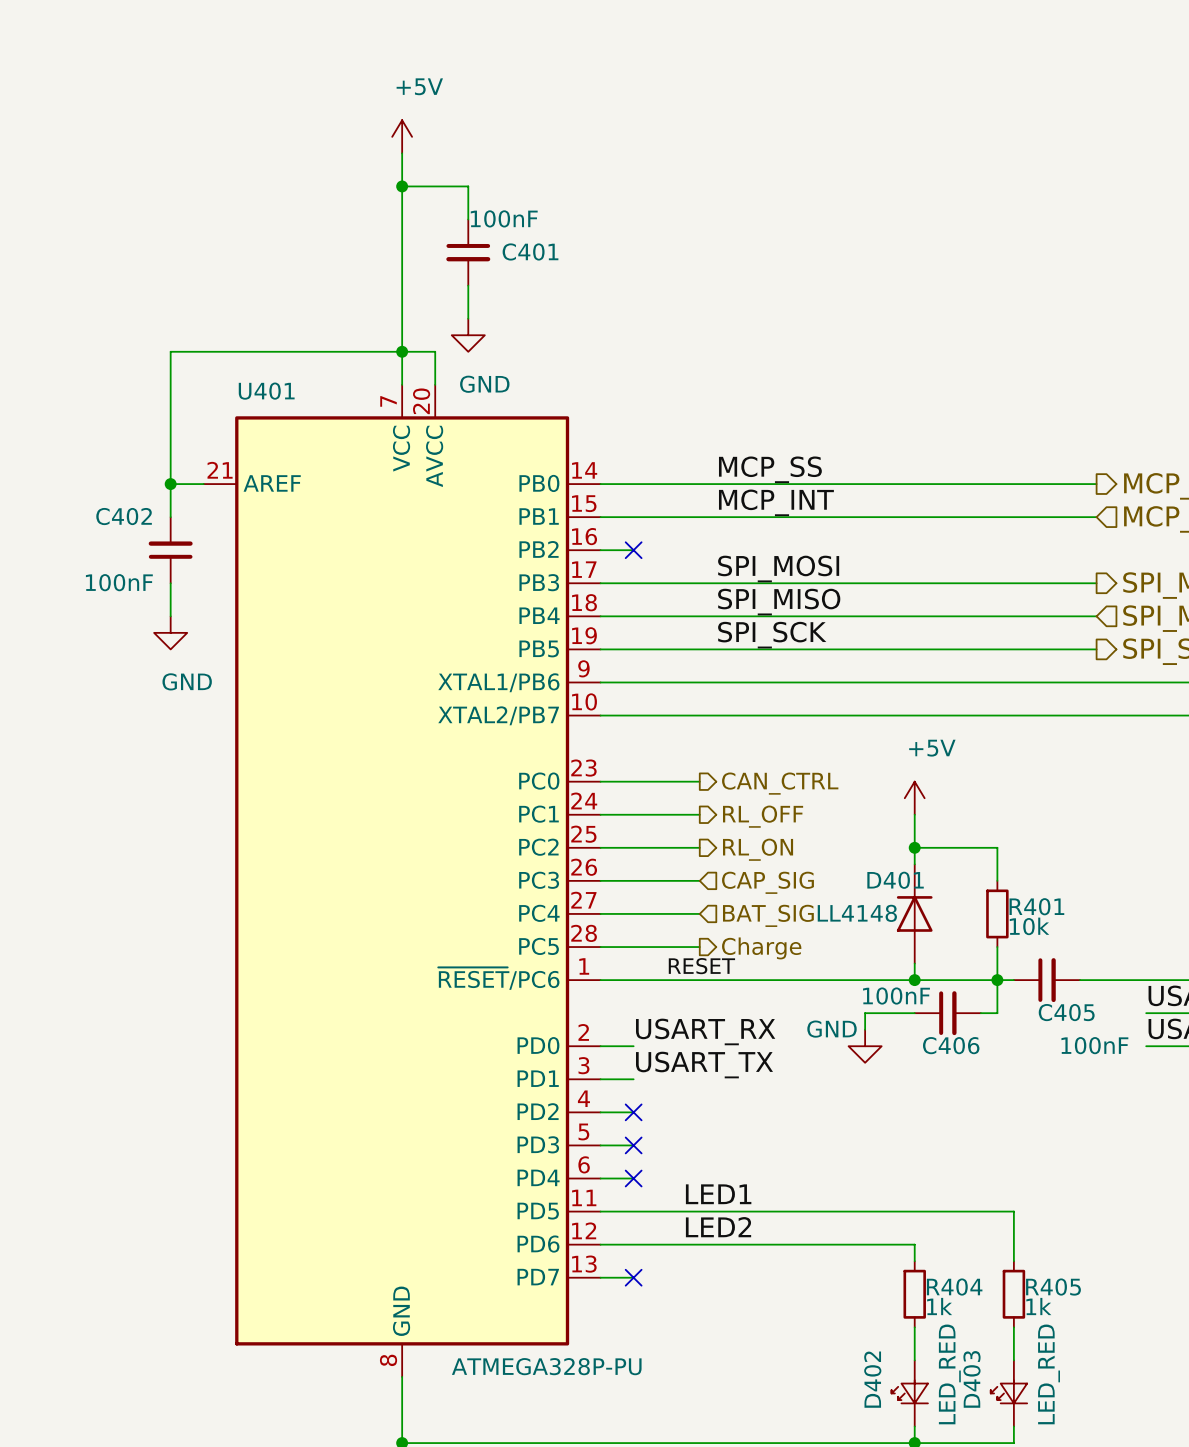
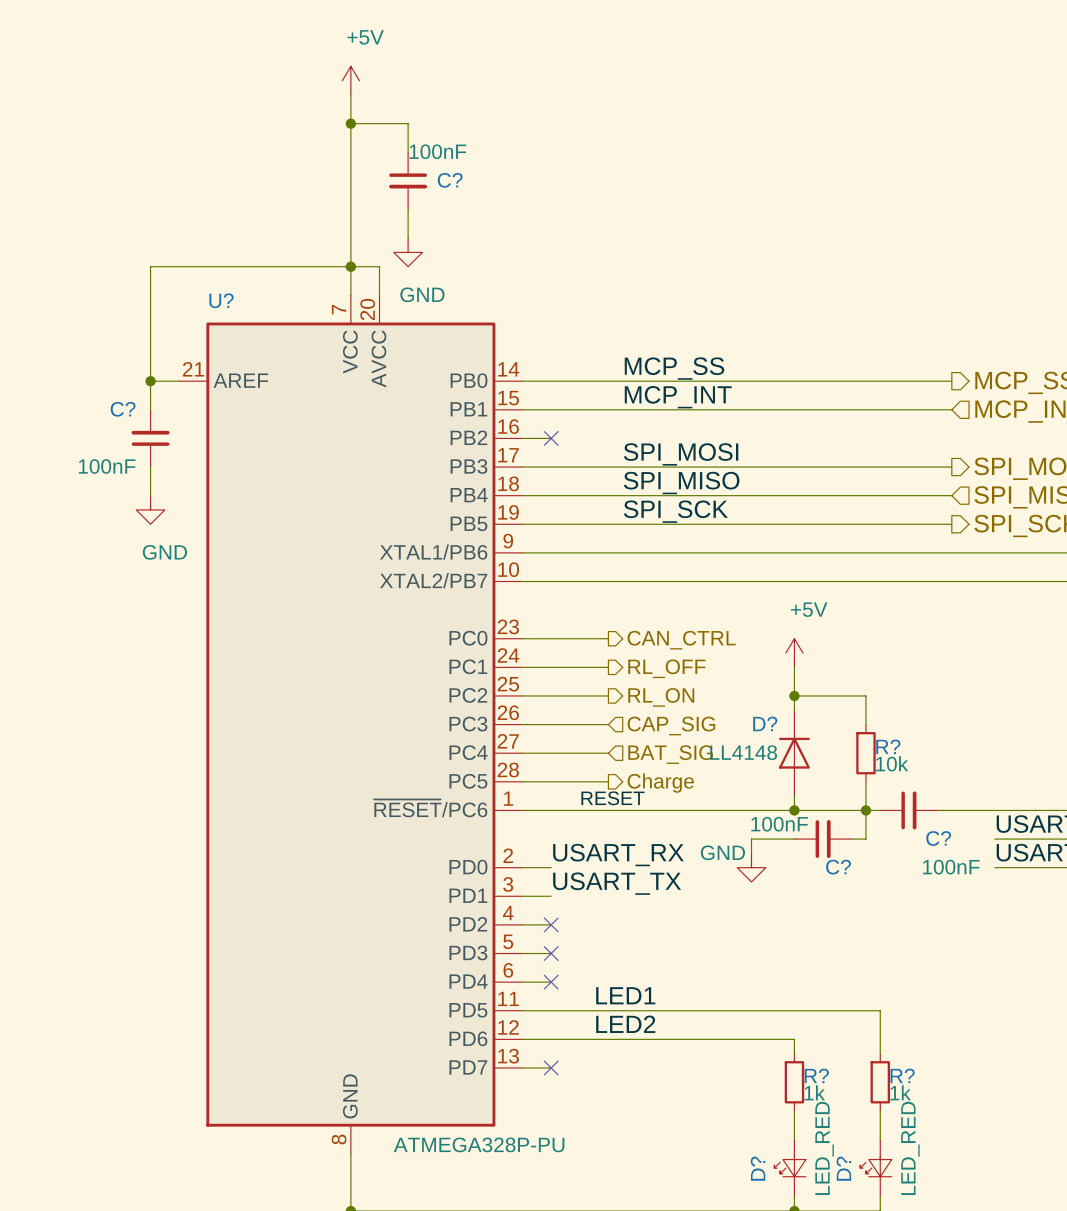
C401 name: C401 (530, 251) -> C? (450, 180)
U401 name: U401 (266, 391) -> U? (221, 300)
C402 name: C402 (124, 516) -> C? (123, 409)
D401 name: D401 (895, 880) -> D? (765, 723)
R401 name: R401 (1036, 906) -> R? (888, 746)
C405 name: C405 (1066, 1012) -> C? (938, 838)
C406 name: C406 (951, 1045) -> C? (838, 867)
R404 name: R404 (954, 1287) -> R? (816, 1075)
R405 name: R405 (1053, 1287) -> R? (902, 1075)
D402 name: D402 (872, 1379) -> D? (758, 1168)
D403 name: D403 (971, 1379) -> D? (843, 1168)

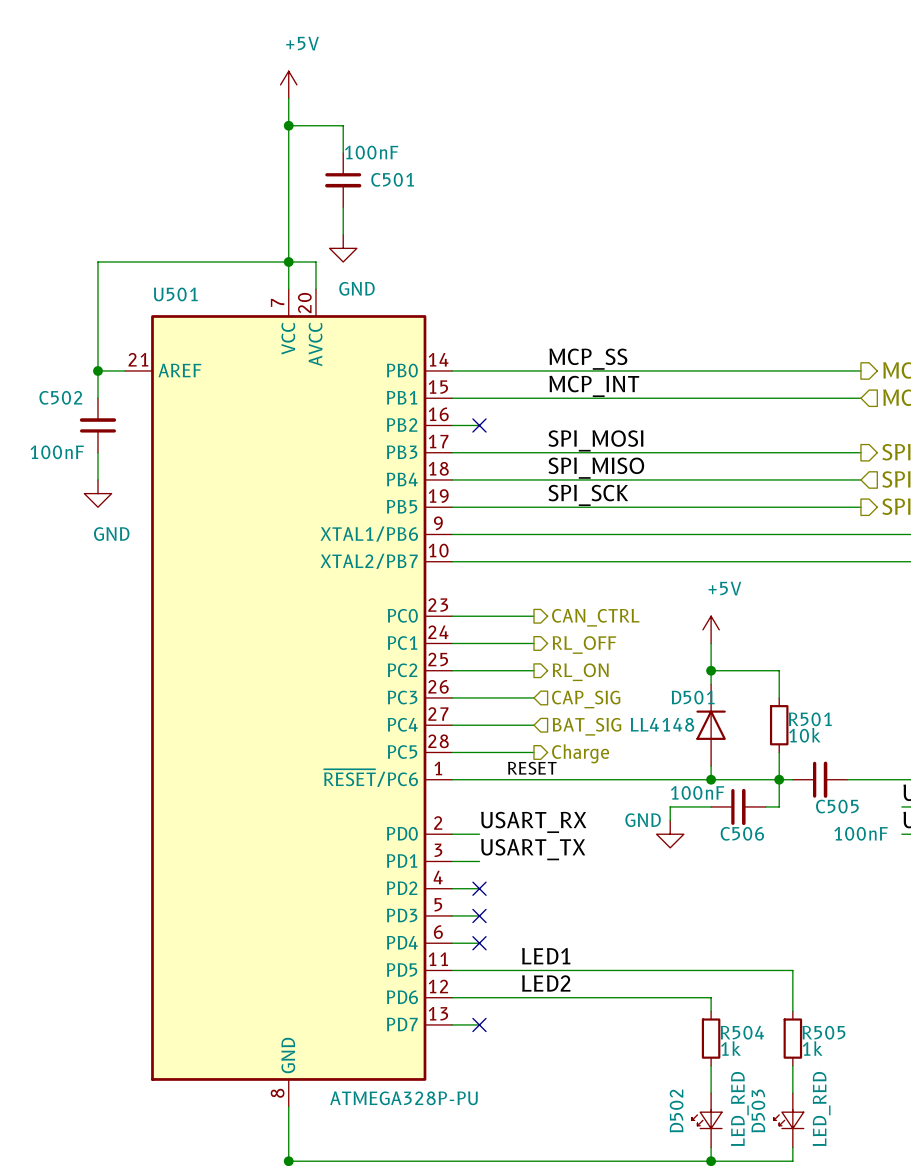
C? name: C? (450, 180) -> C501 (392, 179)
U? name: U? (221, 300) -> U501 (175, 294)
C? name: C? (123, 409) -> C502 (60, 397)
D? name: D? (765, 723) -> D501 (693, 697)
R? name: R? (888, 746) -> R501 (810, 719)
C? name: C? (938, 838) -> C505 (837, 806)
C? name: C? (838, 867) -> C506 (742, 833)
R? name: R? (816, 1075) -> R504 (742, 1032)
R? name: R? (902, 1075) -> R505 (823, 1032)
D? name: D? (758, 1168) -> D502 (676, 1110)
D? name: D? (843, 1168) -> D503 (758, 1110)

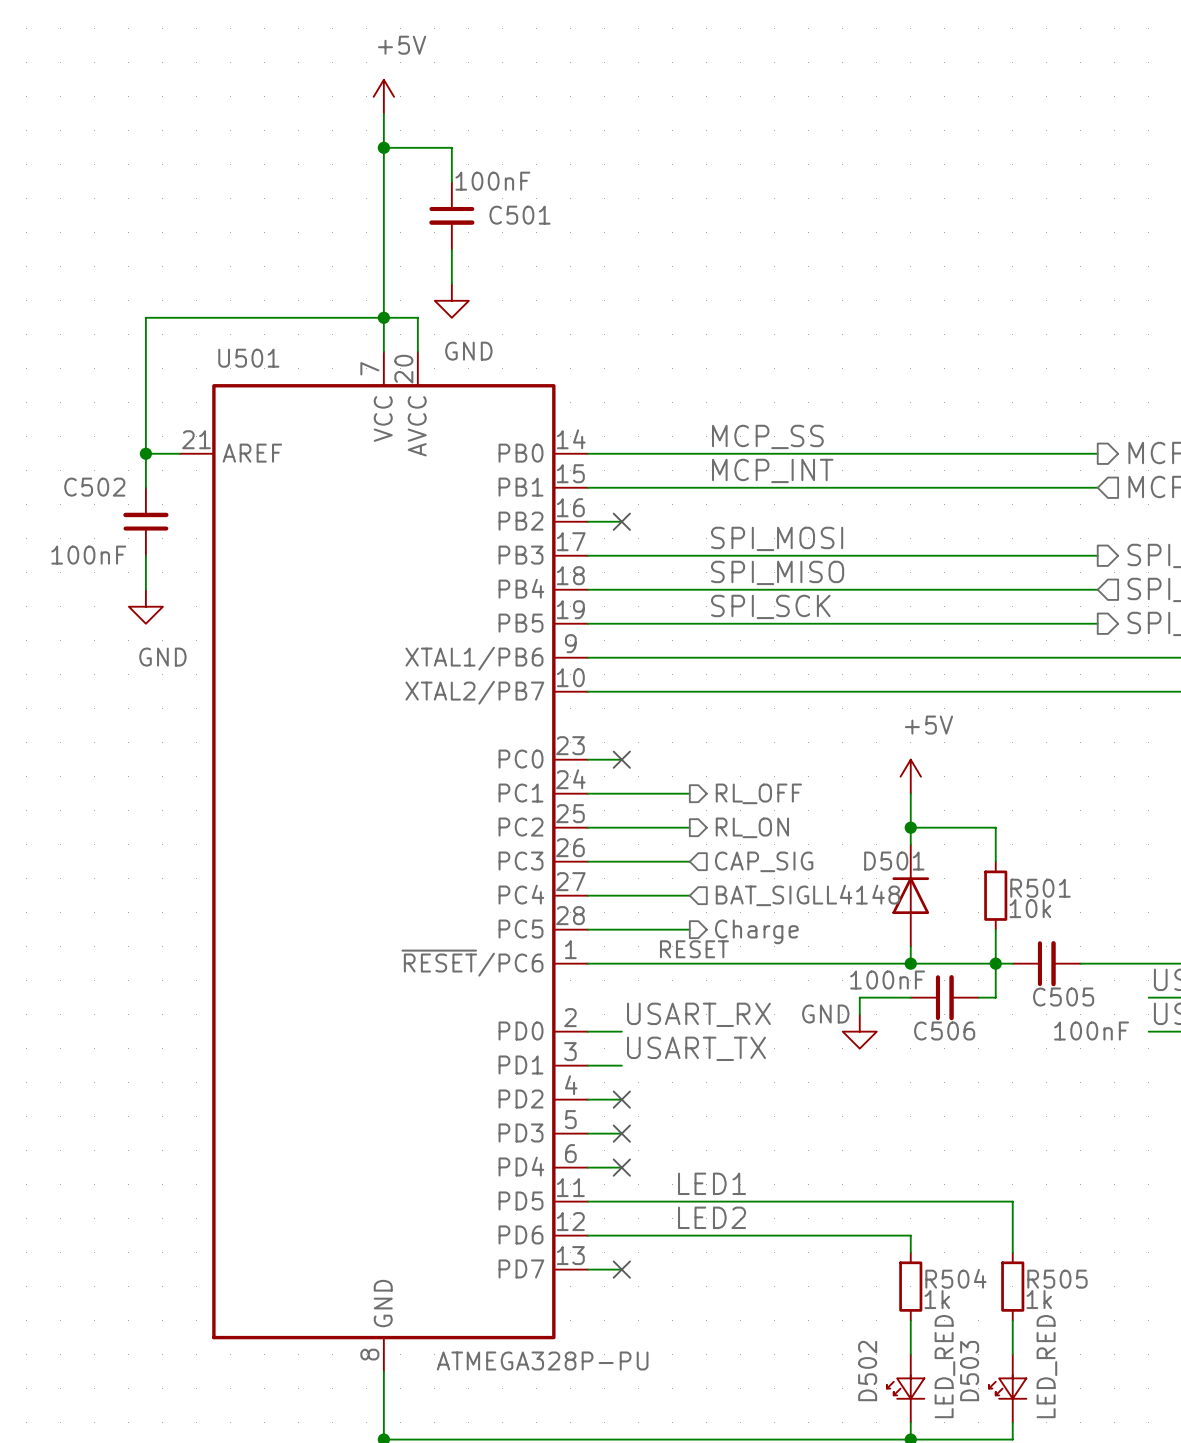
wire: (479, 616) (533, 616) -> none
no-connect mark: none -> (621, 759)
hierarchical label: CAN_CTRL (595, 617) -> none

